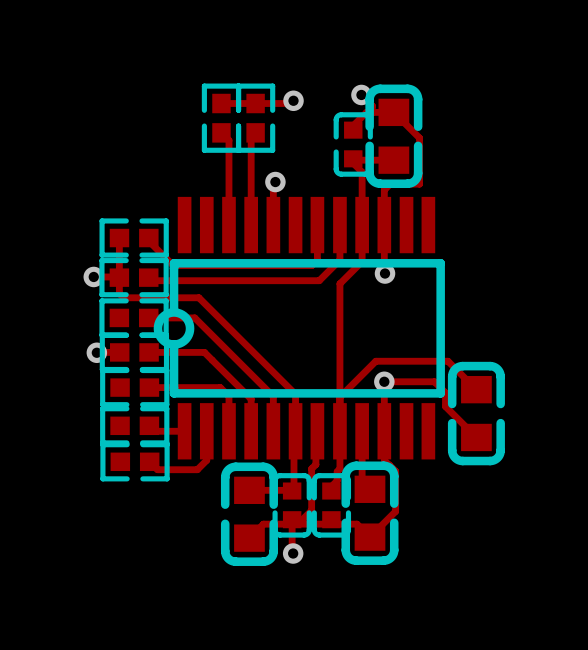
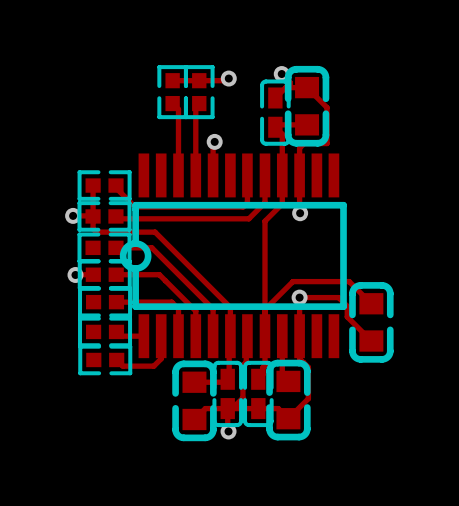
part footprint: [333, 112, 373, 177] -> [260, 79, 291, 146]
part footprint: [272, 473, 312, 538] -> [212, 360, 244, 428]
part footprint: [311, 473, 352, 538] -> [243, 360, 274, 428]

